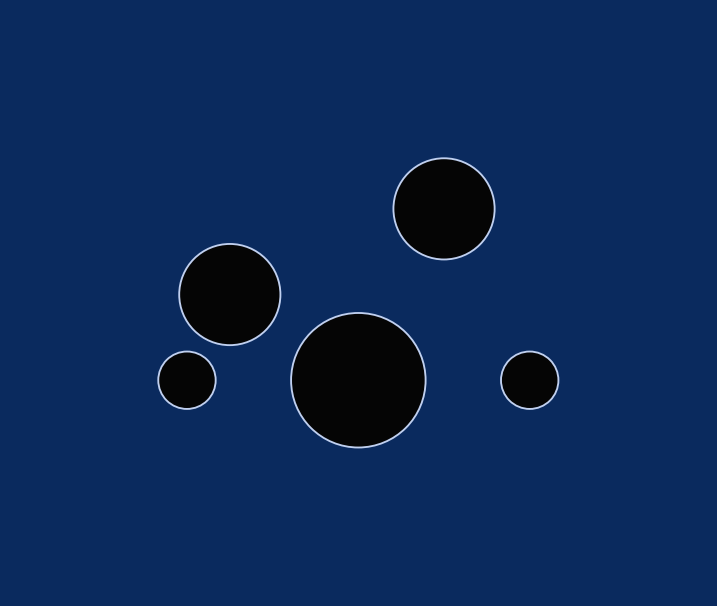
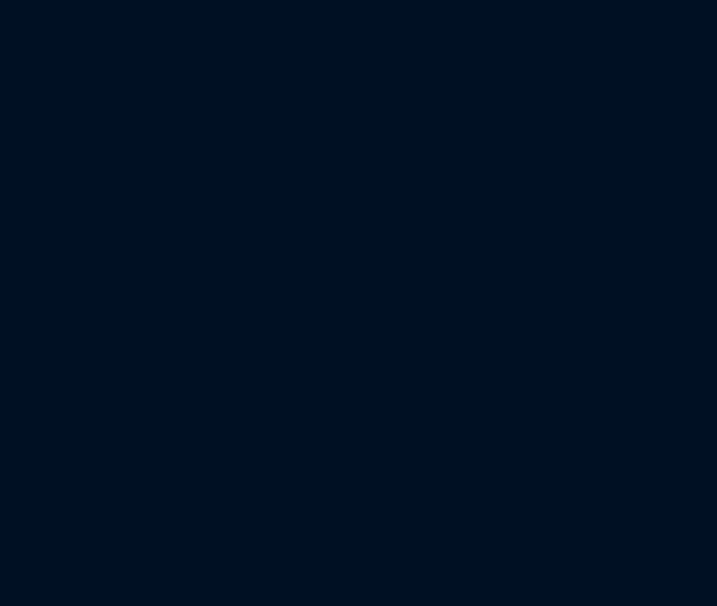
part: (358, 302) -> none

